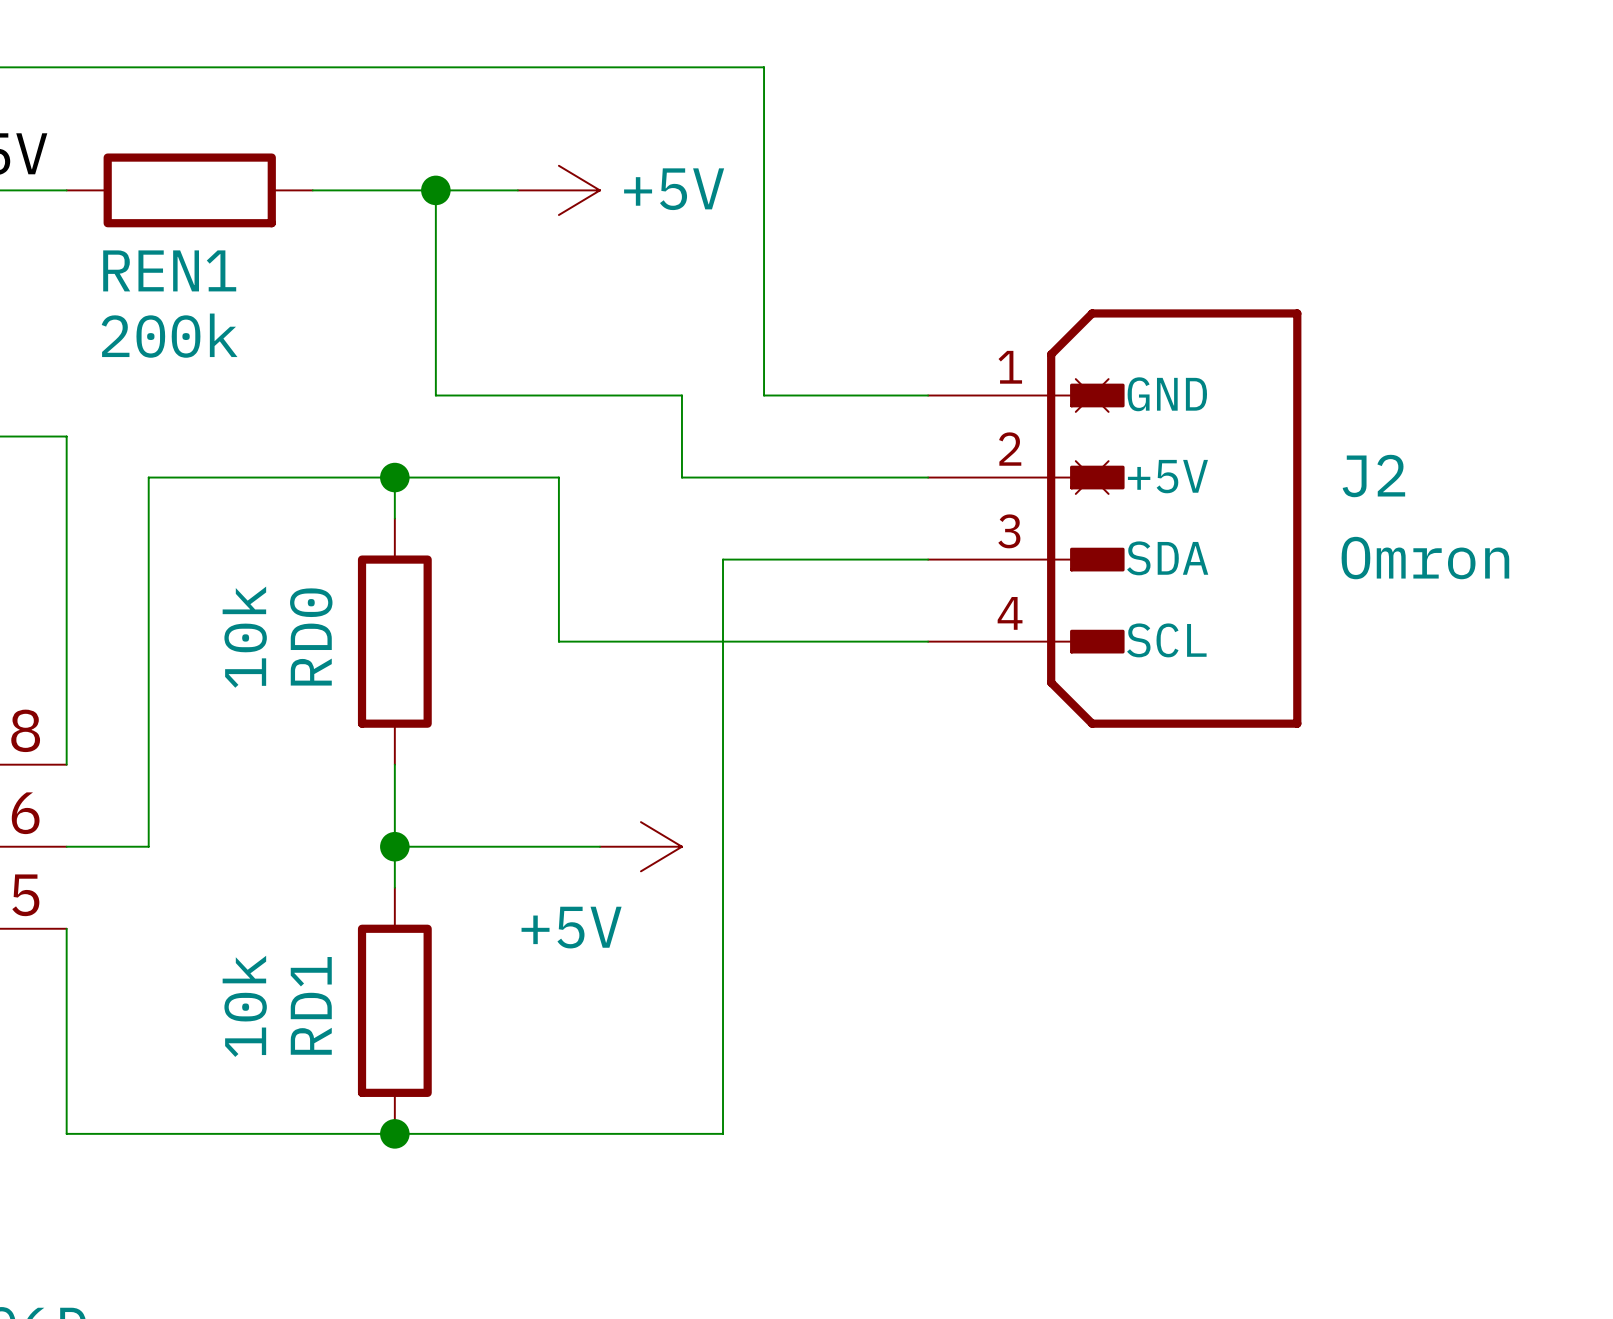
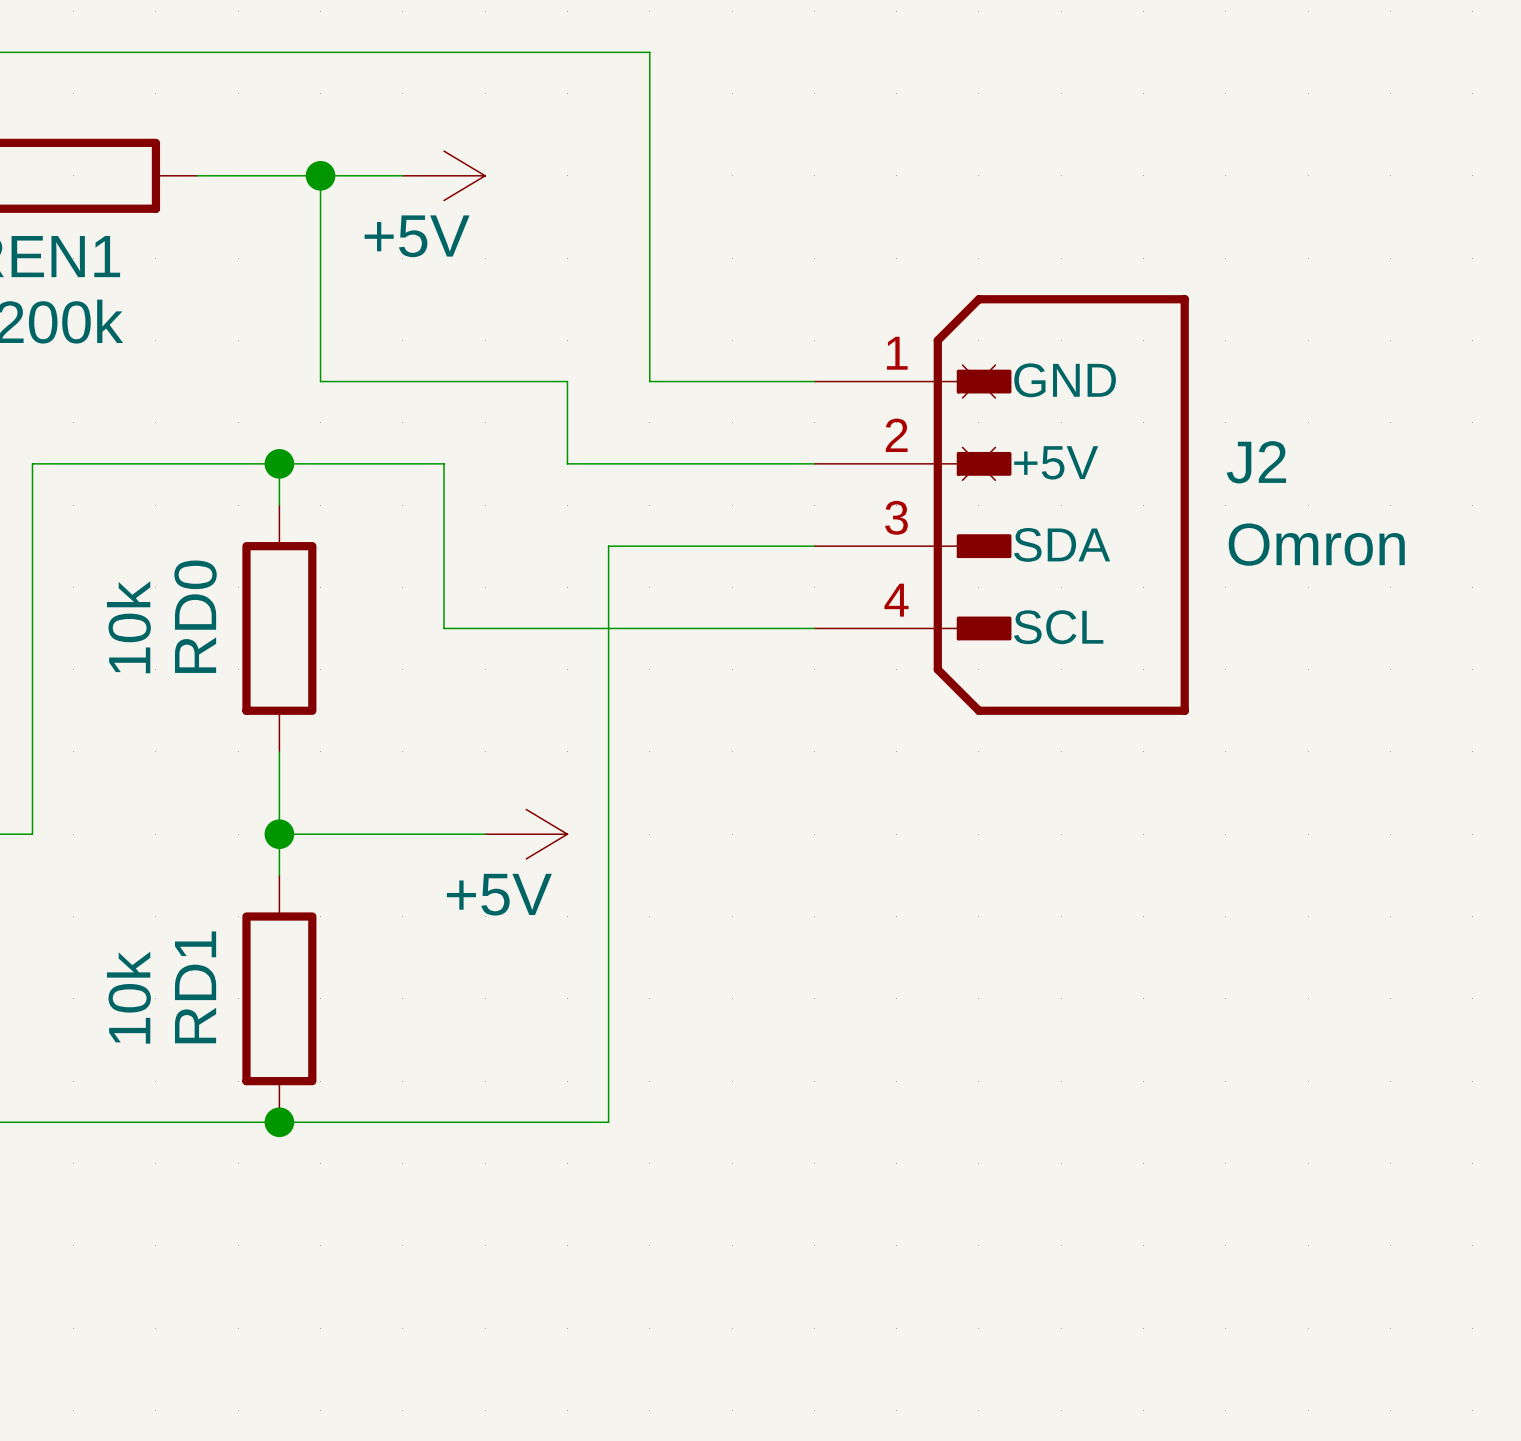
power symbol text position: +5V (674, 189) -> +5V (417, 236)
power symbol text position: +5V (571, 927) -> +5V (499, 894)

